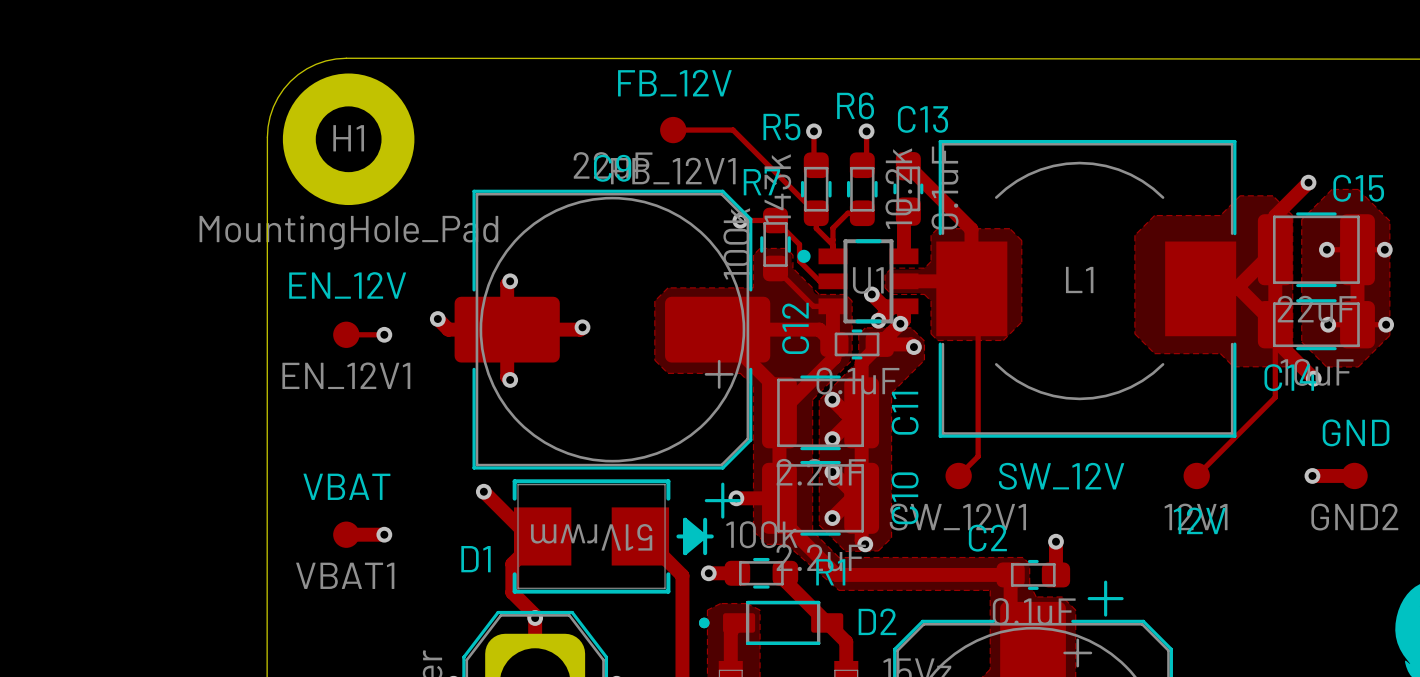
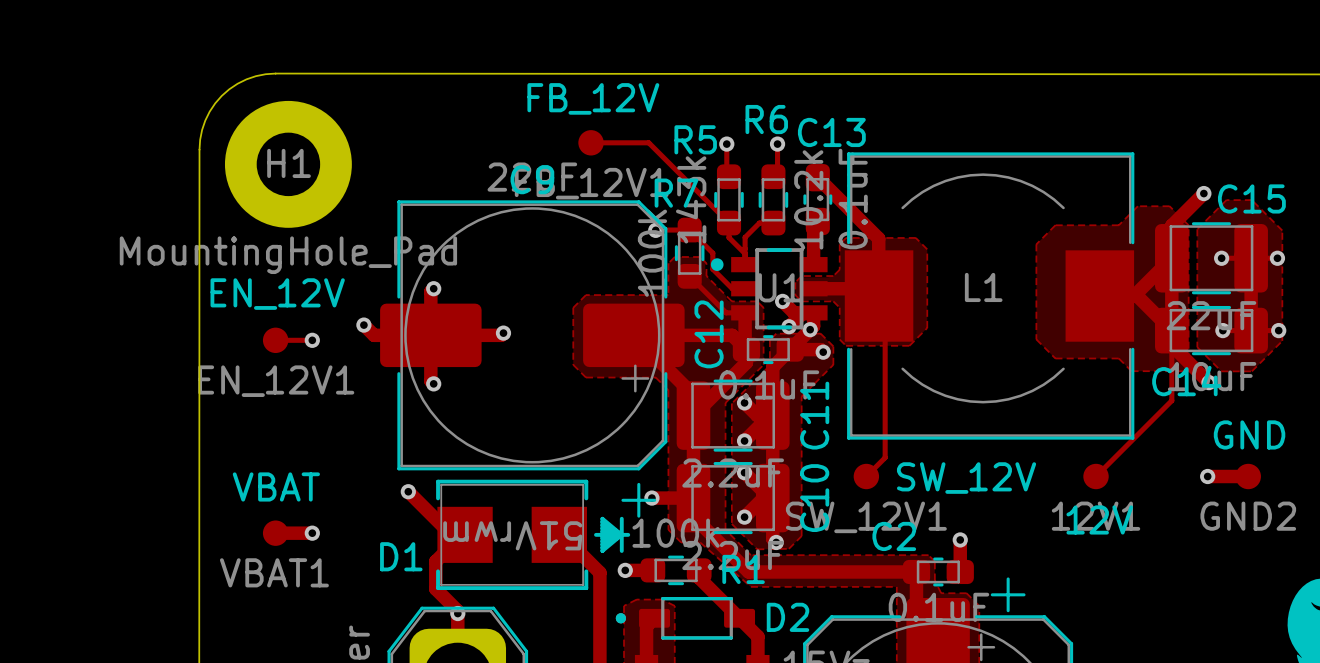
H1 position: (348, 139) -> (288, 164)

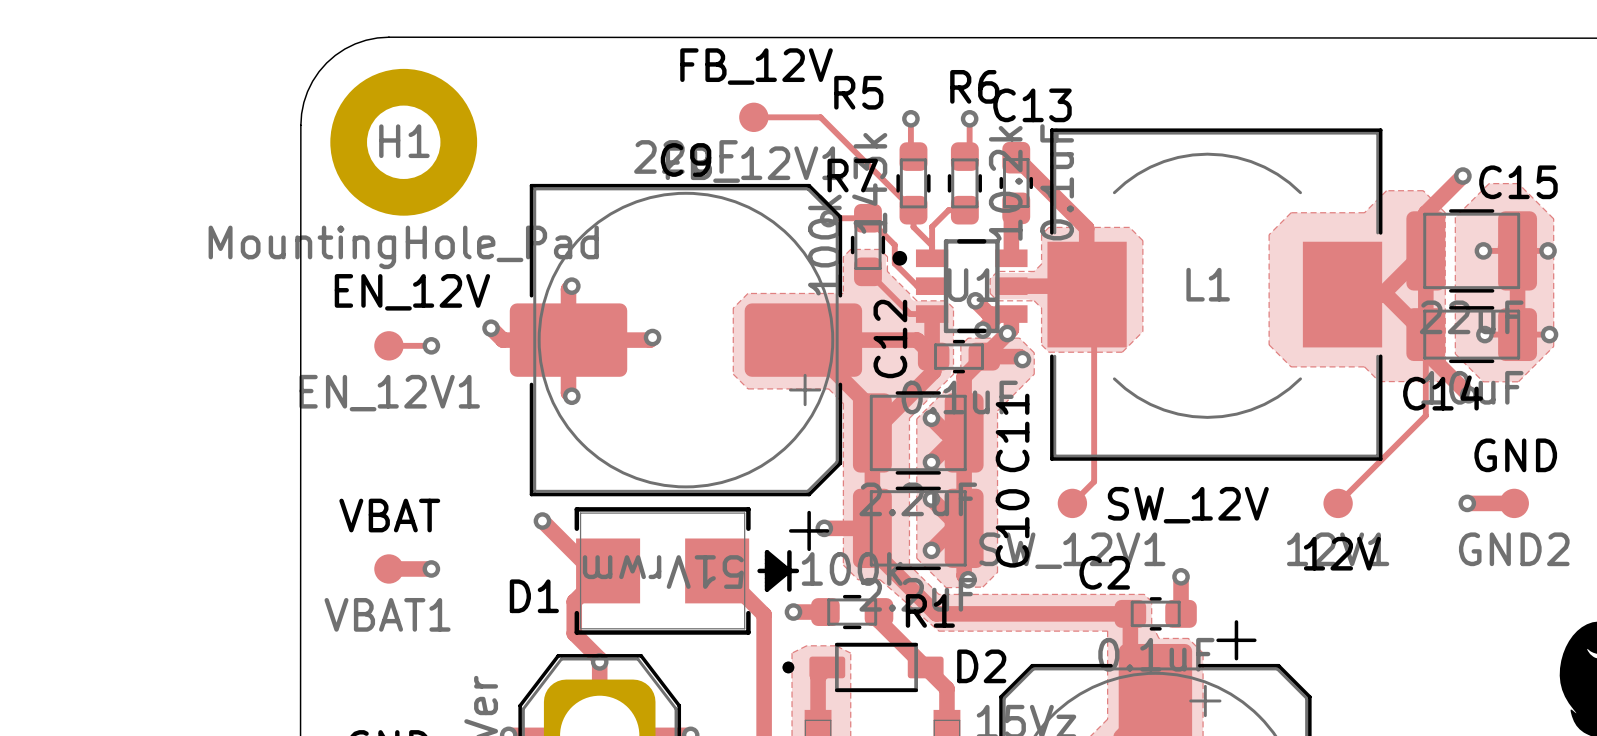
R6 name position: R6 (766, 119) -> R6 (974, 86)
R5 name position: R5 (695, 139) -> R5 (858, 92)
EN_12V1 value position: EN_12V (277, 294) -> EN_12V (412, 292)

